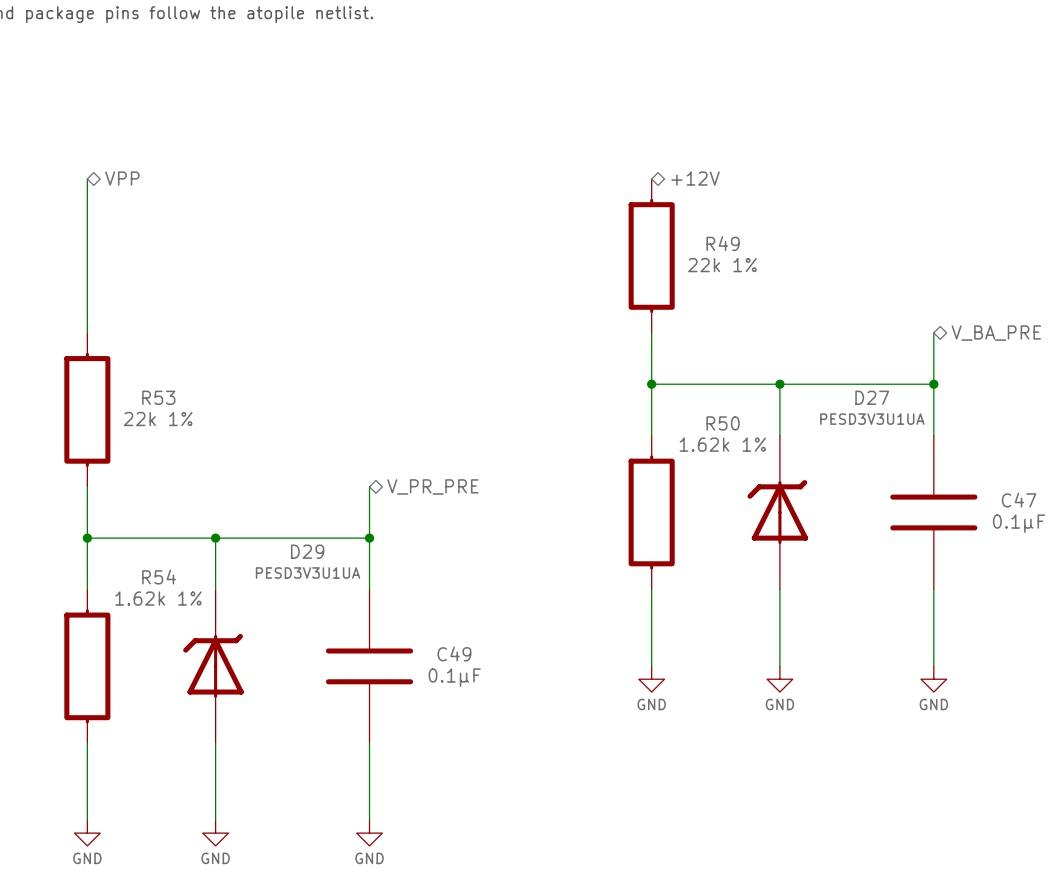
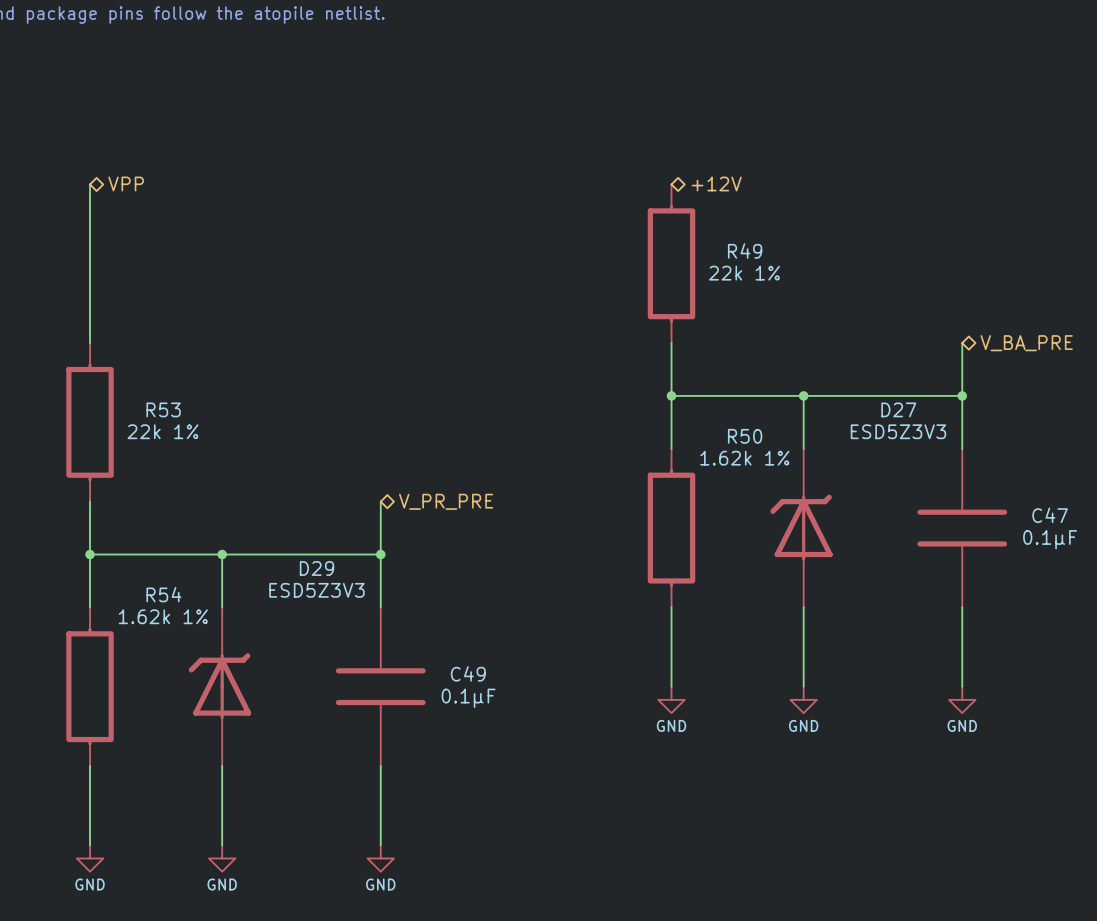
D27 value: PESD3V3U1UA (872, 419) -> ESD5Z3V3 (898, 431)
D29 value: PESD3V3U1UA (308, 573) -> ESD5Z3V3 (316, 590)

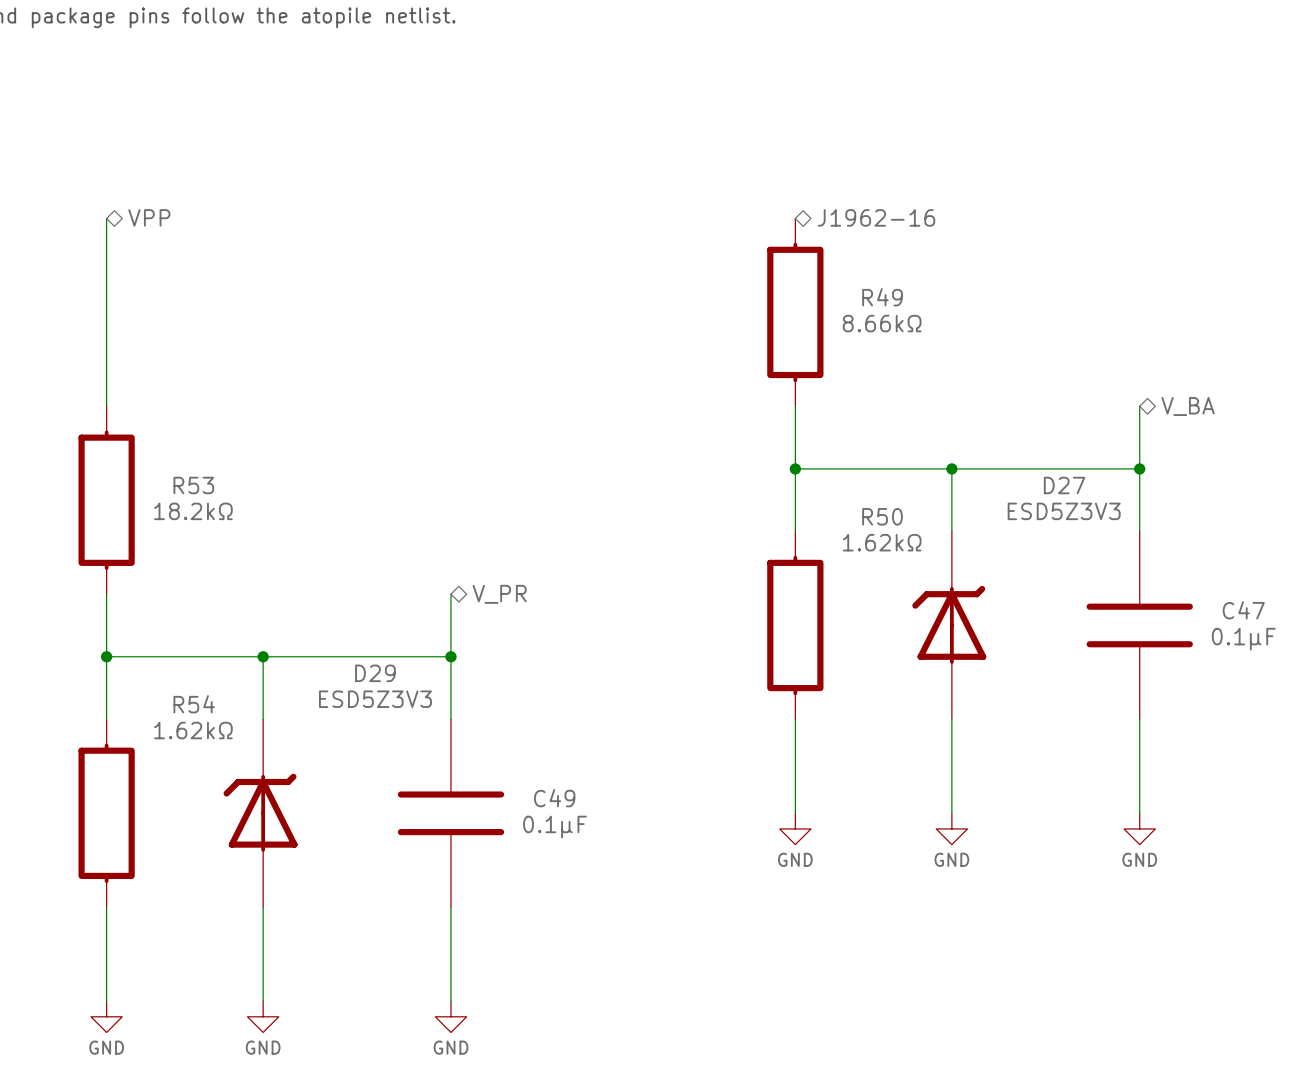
hierarchical label: +12V (716, 183) -> J1962-16 (876, 217)
R49 value: 22k 1% (744, 273) -> 8.66kΩ (882, 323)
hierarchical label: V_BA_PRE (1026, 343) -> V_BA (1188, 406)
R53 value: 22k 1% (162, 431) -> 18.2kΩ (193, 511)
R50 value: 1.62k 1% (744, 458) -> 1.62kΩ (882, 542)
hierarchical label: V_PR_PRE (446, 501) -> V_PR (499, 594)
R54 value: 1.62k 1% (163, 616) -> 1.62kΩ (193, 730)

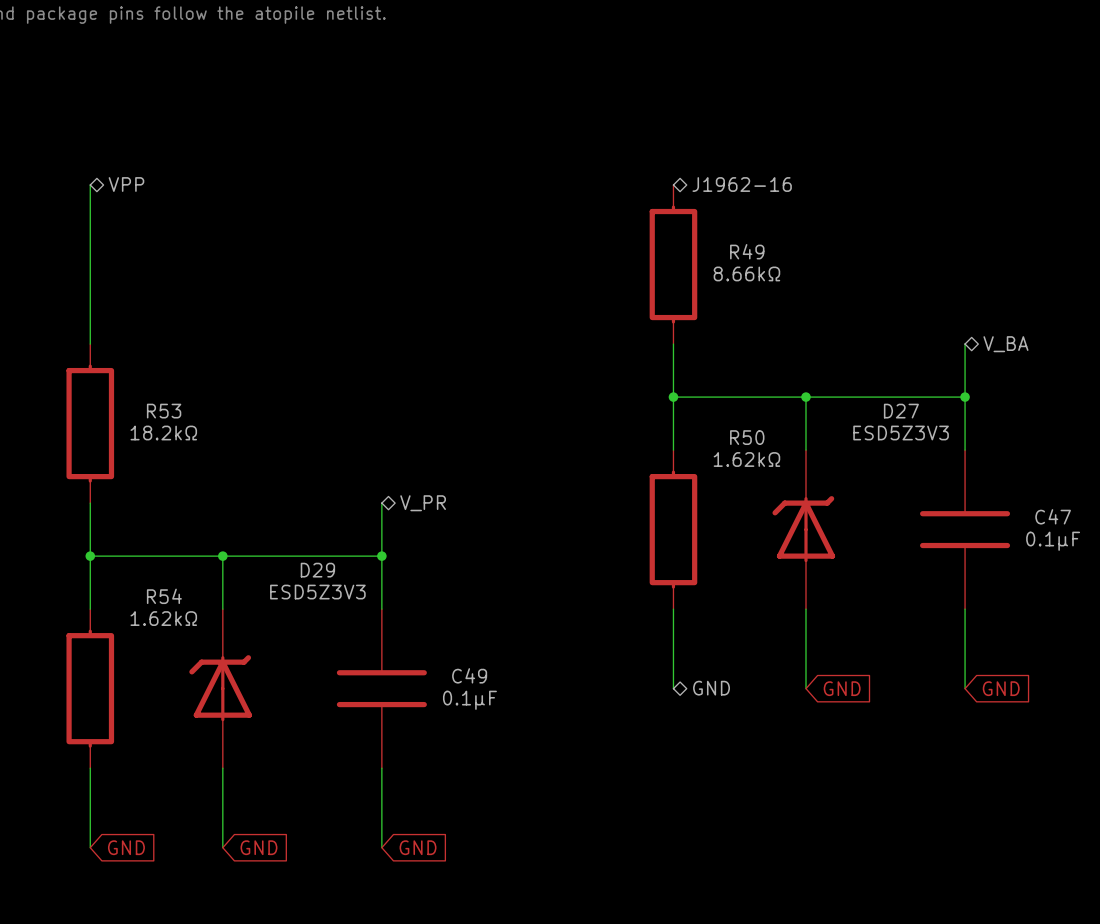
hierarchical label: none -> GND (711, 688)
global label: none -> GND (842, 688)
global label: none -> GND (1001, 688)
power symbol: GND (795, 828) -> none
power symbol: GND (951, 828) -> none
power symbol: GND (1139, 828) -> none
global label: none -> GND (126, 847)
global label: none -> GND (258, 847)
global label: none -> GND (418, 847)
power symbol: GND (106, 1016) -> none
power symbol: GND (263, 1016) -> none
power symbol: GND (450, 1016) -> none

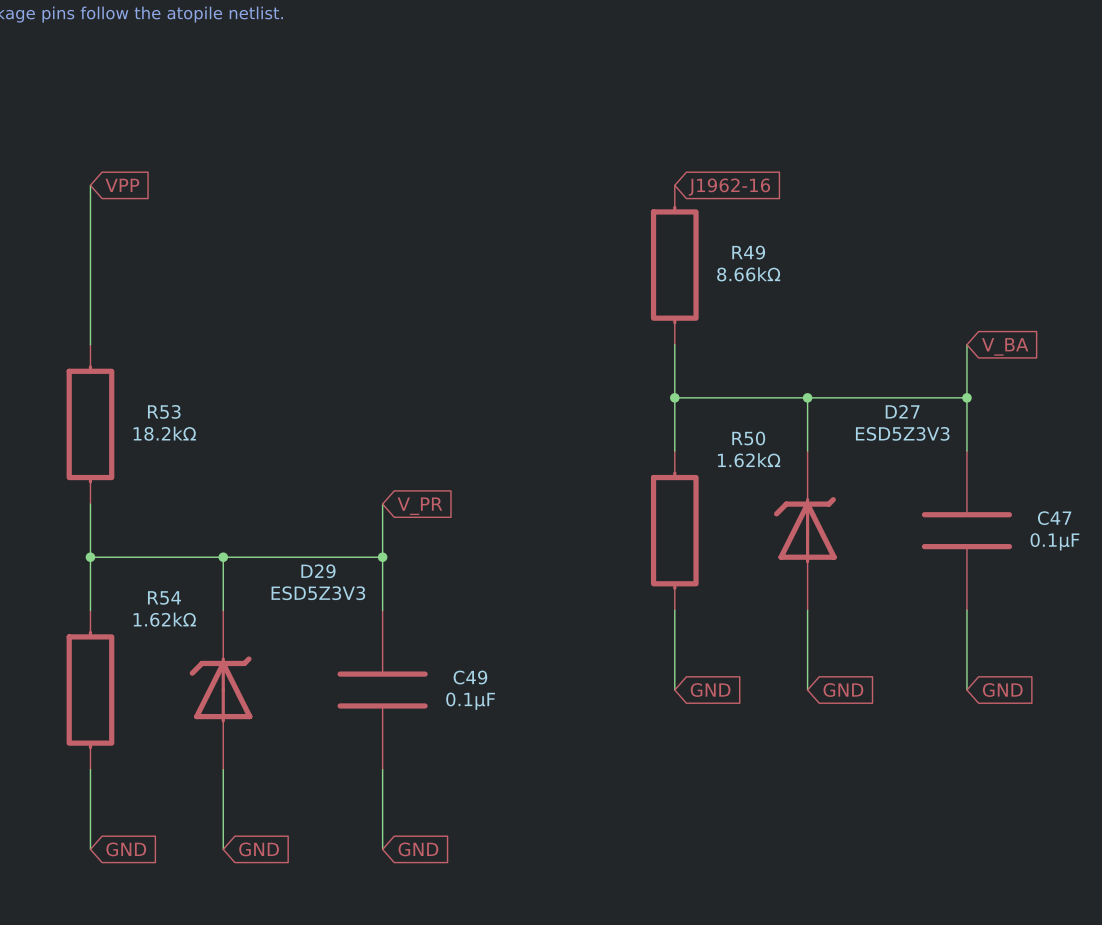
hierarchical label: VPP (126, 184) -> none
hierarchical label: J1962-16 (742, 184) -> none
global label: none -> VPP (122, 185)
global label: none -> J1962-16 (729, 187)
global label: none -> V_BA (1005, 346)
hierarchical label: V_BA (1005, 344) -> none
global label: none -> V_PR (419, 506)
hierarchical label: V_PR (423, 503) -> none
global label: none -> GND (710, 690)
hierarchical label: GND (711, 688) -> none

